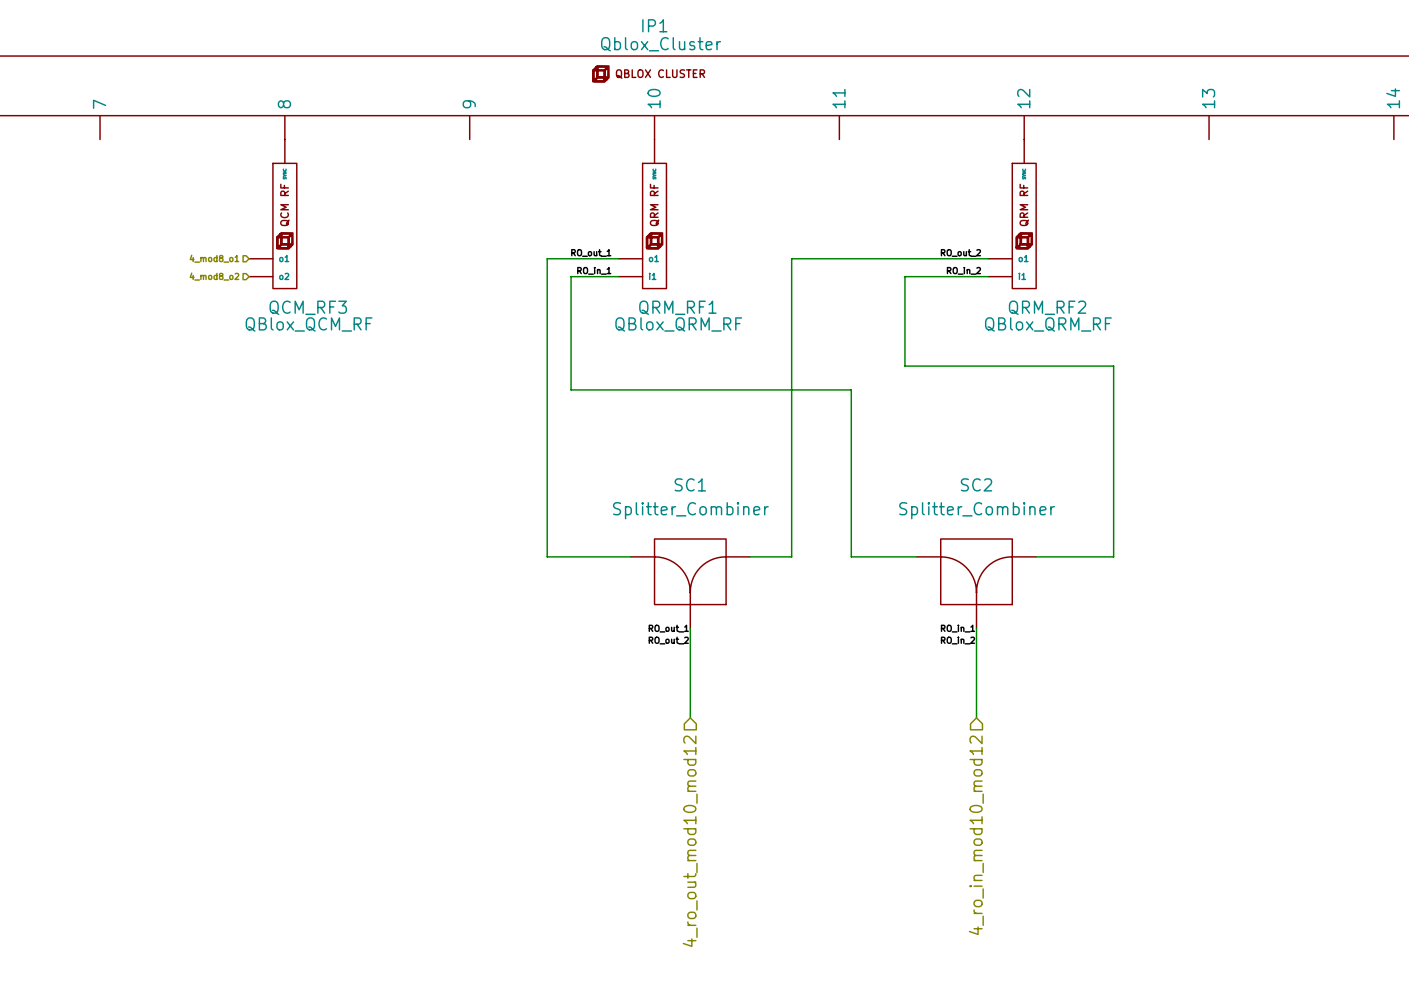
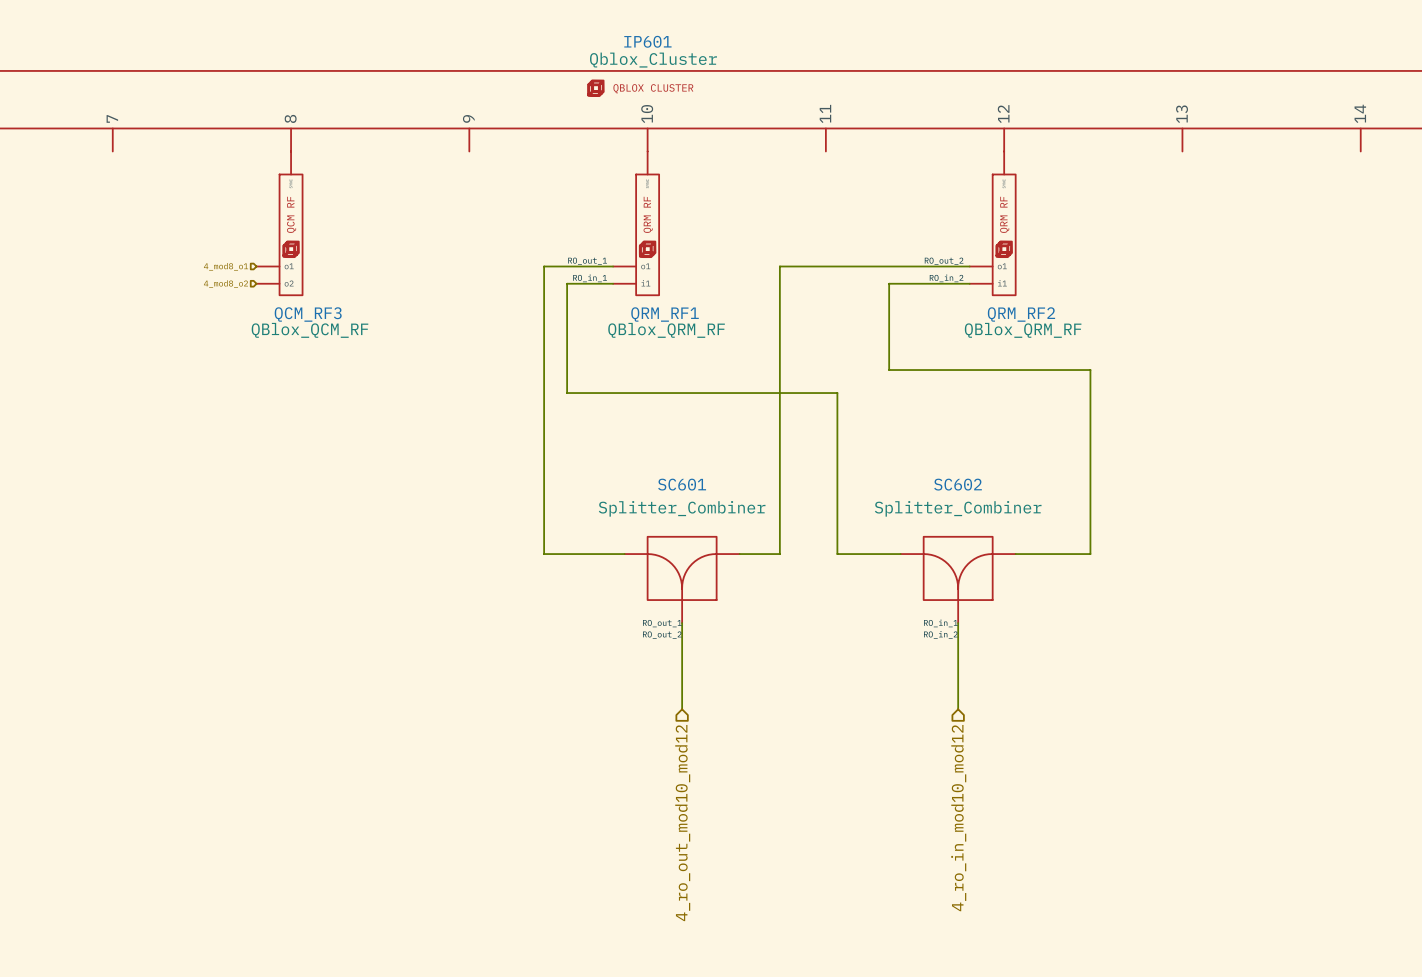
IP1 name: IP1 (654, 25) -> IP601 (647, 41)
SC1 name: SC1 (690, 484) -> SC601 (682, 484)
SC2 name: SC2 (976, 484) -> SC602 (958, 484)

